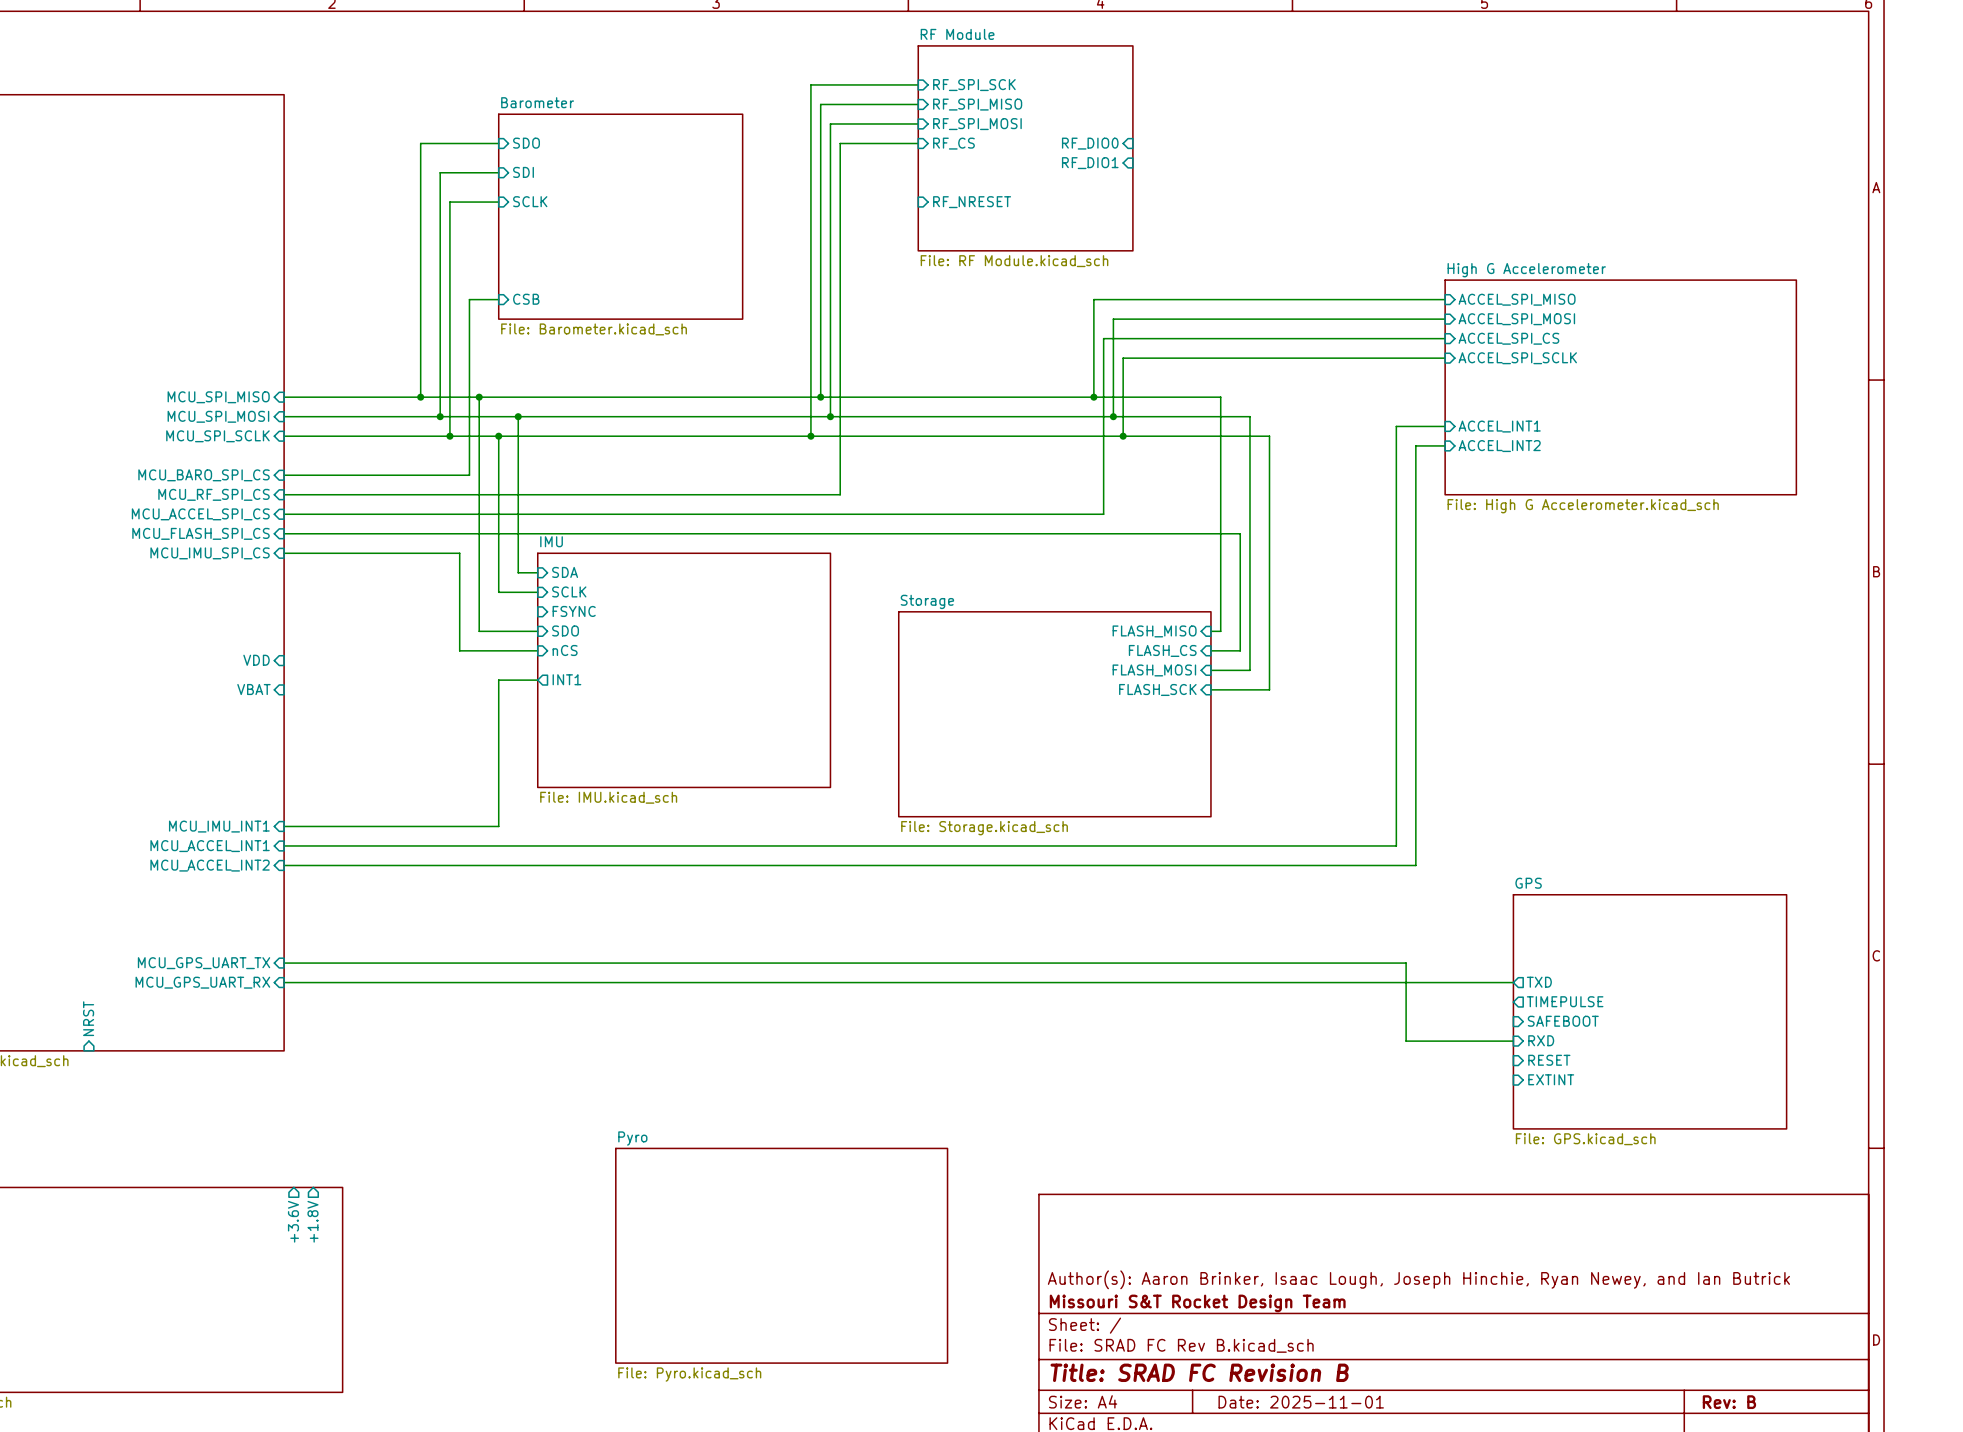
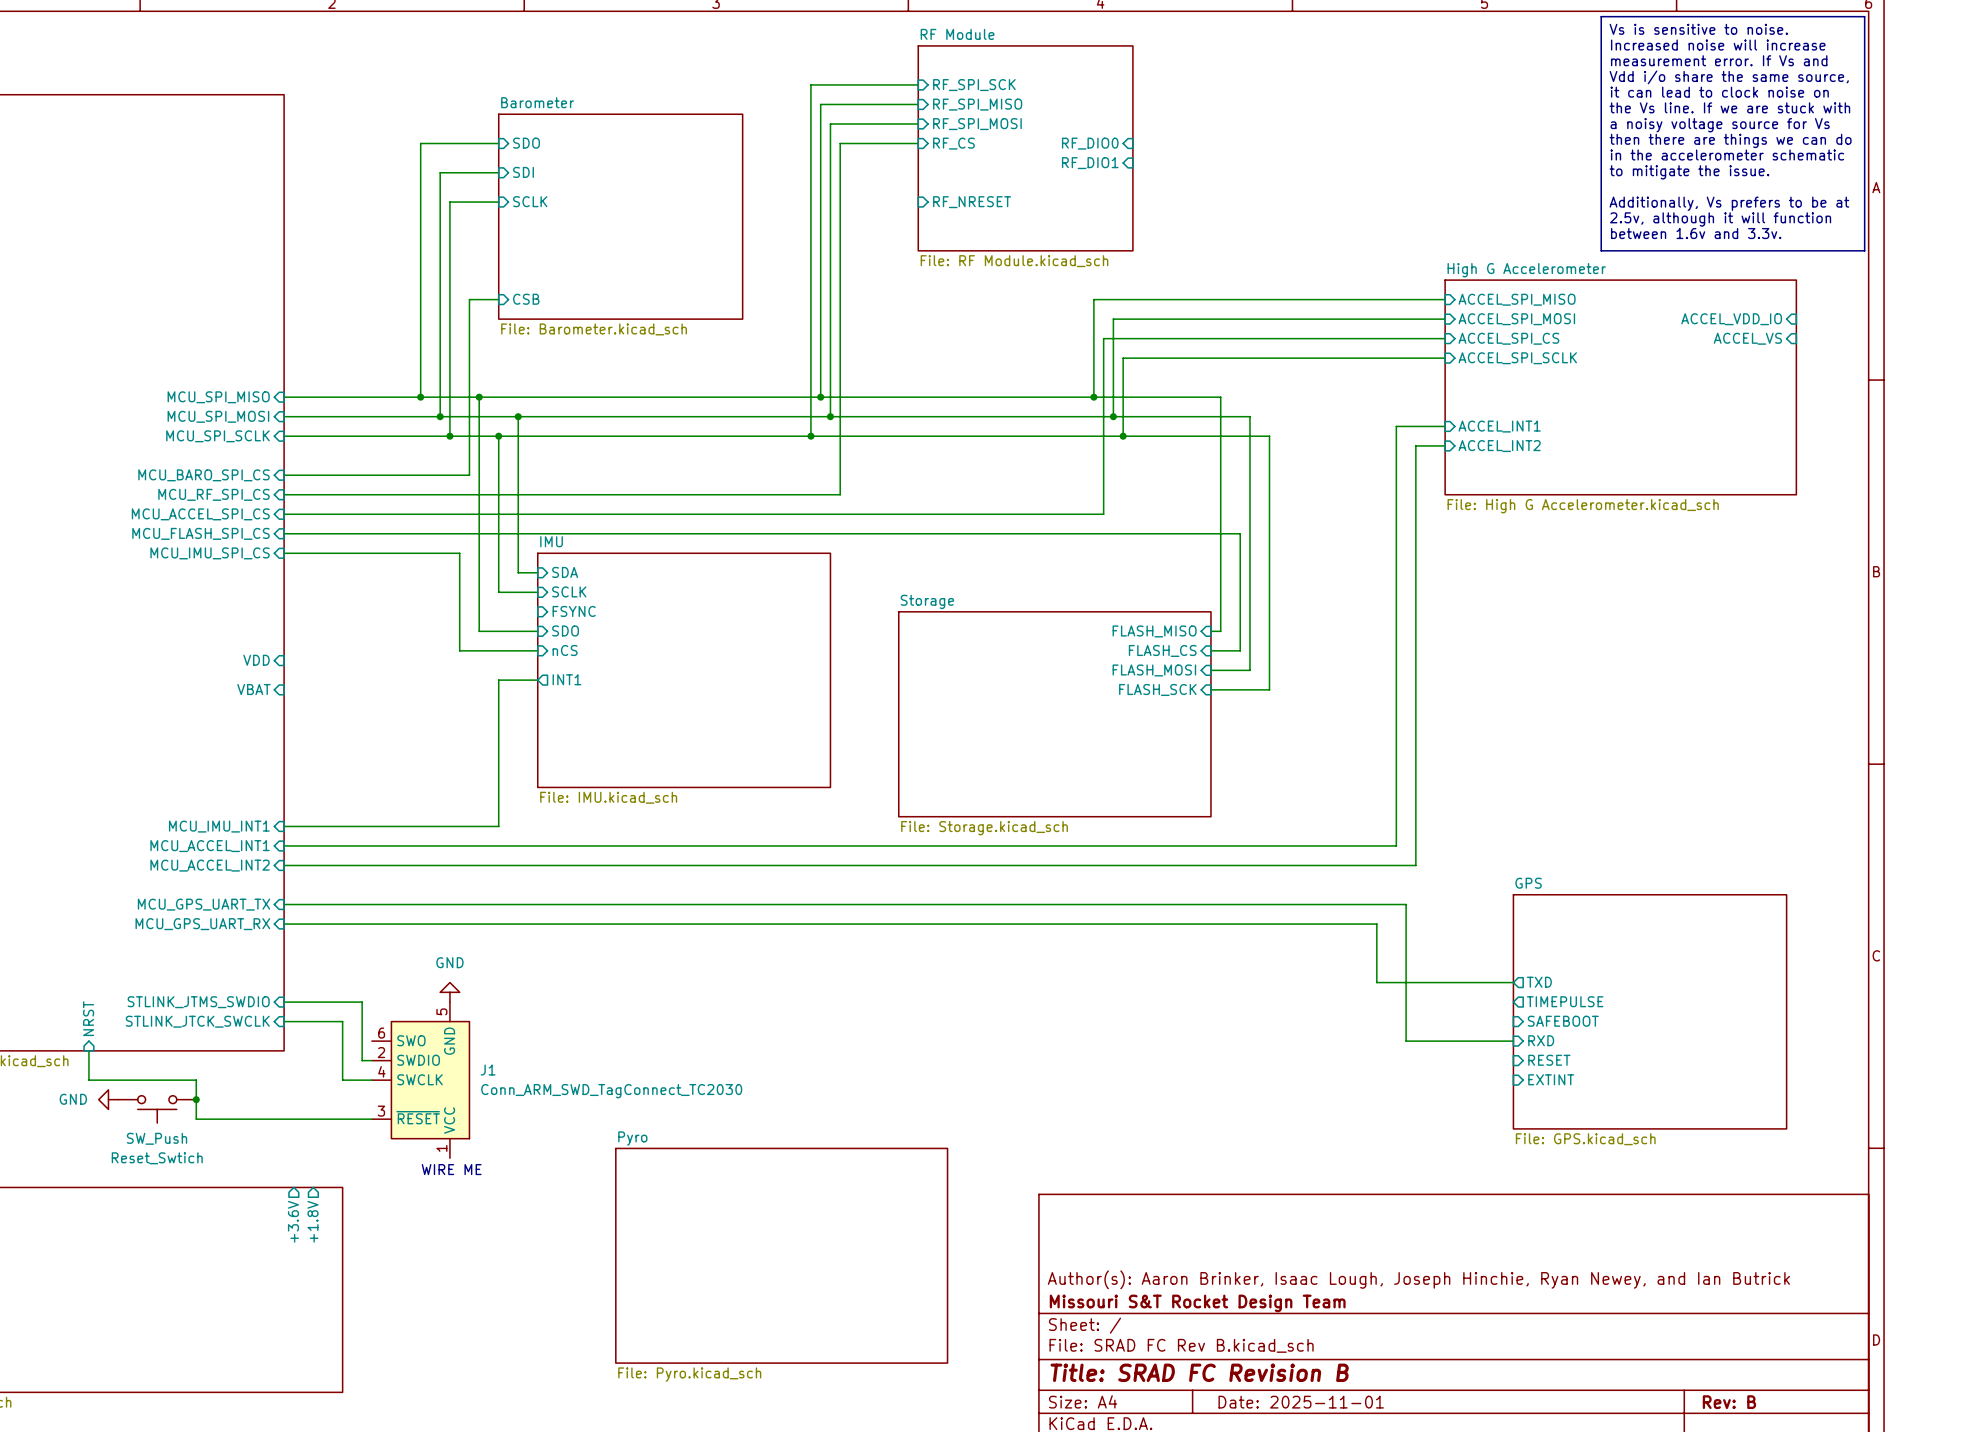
line: none -> (1601, 16) (1864, 16) (1864, 250) (1601, 250) (1601, 16)
text: none -> Vs is sensitive to noise. (1698, 29)
text: none -> Increased noise will increase (1718, 45)
text: none -> measurement error. If Vs and (1719, 60)
text: none -> Vdd i/o share the same source, (1729, 77)
text: none -> it can lead to clock noise on (1719, 92)
text: none -> the Vs line. If we are stuck with (1729, 107)
text: none -> a noisy voltage source for Vs (1720, 125)
text: none -> then there are things we can do (1730, 140)
text: none -> in the accelerometer schematic (1727, 154)
text: none -> to mitigate the issue. (1689, 172)
text: none -> Additionally, Vs prefers to be at (1729, 203)
text: none -> 2.5v, although it will function (1720, 219)
text: none -> between 1.6v and 3.3v. (1696, 233)
sheet pin: none -> ACCEL_VDD_IO (1731, 319)
sheet pin: none -> ACCEL_VS (1747, 338)
sheet pin position: MCU_GPS_UART_TX (204, 963) -> MCU_GPS_UART_TX (204, 904)
wire: (284, 963) (1406, 963) -> (284, 904) (1406, 904) (1406, 963)
sheet pin position: MCU_GPS_UART_RX (202, 982) -> MCU_GPS_UART_RX (202, 924)
wire: (284, 982) (1376, 982) -> (284, 924) (1376, 924) (1376, 982)
power symbol: none -> GND (449, 992)
sheet pin: none -> STLINK_JTMS_SWDIO (198, 1002)
wire: none -> (284, 1002) (362, 1002) (362, 1060) (371, 1060)
sheet pin: none -> STLINK_JTCK_SWCLK (197, 1021)
wire: none -> (284, 1021) (342, 1021) (342, 1080) (371, 1080)
wire: none -> (88, 1050) (88, 1080) (196, 1080) (196, 1119) (371, 1119)
J1: none -> Conn_ARM_SWD_TagConnect_TC2030 (420, 1080)
power symbol: none -> GND (108, 1099)
junction: none -> (196, 1099)
Reset_Swtich: none -> SW_Push (157, 1109)
text: none -> WIRE ME (451, 1169)

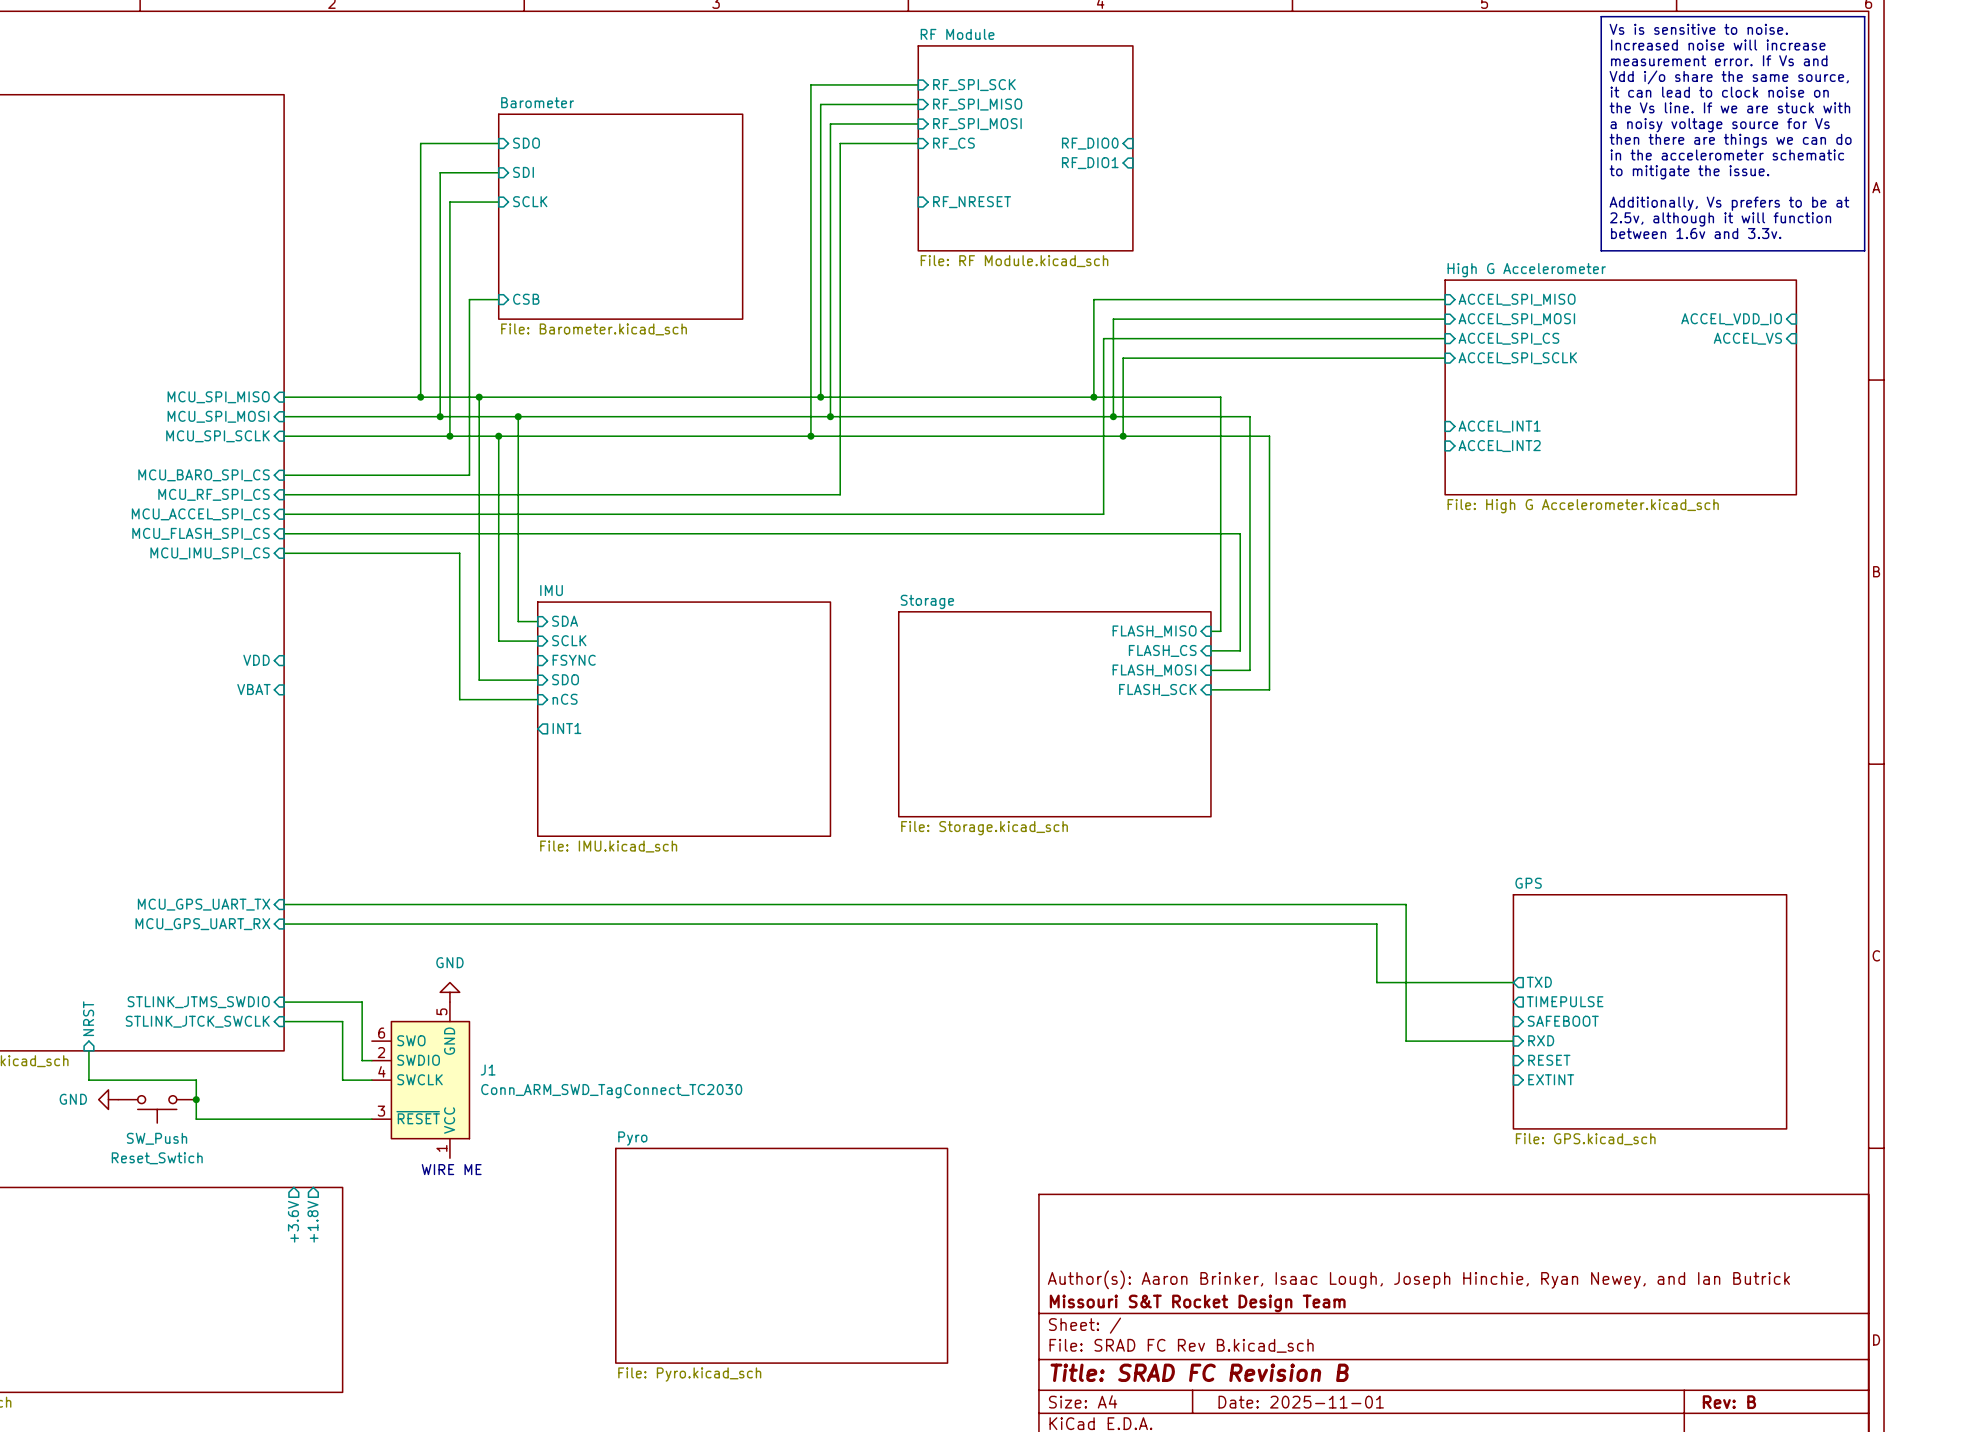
wire: (1445, 426) (1396, 426) (1396, 845) (284, 845) -> none
wire: (1445, 445) (1415, 445) (1415, 865) (284, 865) -> none
wire: (518, 572) (537, 572) -> (518, 572) (518, 621) (537, 621)
sheet pin position: SDA (565, 572) -> SDA (565, 621)
sheet pin position: SCLK (569, 591) -> SCLK (569, 640)
wire: (498, 592) (537, 592) -> (498, 592) (498, 641) (537, 641)
sheet pin position: FSYNC (574, 611) -> FSYNC (574, 660)
sheet pin: SDO (565, 630) -> none
wire: (479, 631) (537, 631) -> (479, 631) (479, 680) (498, 680)
wire: (459, 650) (537, 650) -> (459, 650) (459, 699) (537, 699)
sheet pin position: nCS (565, 650) -> nCS (565, 699)
sheet IMU position: (684, 670) -> (684, 719)
sheet pin shape: output (566, 679) -> input (565, 679)
sheet pin: INT1 (566, 679) -> SDO (565, 679)
wire: (498, 680) (498, 826) (284, 826) -> none
sheet pin: none -> INT1 (566, 728)
sheet pin: MCU_IMU_INT1 (219, 826) -> none
sheet pin: MCU_ACCEL_INT1 (210, 846) -> none
sheet pin: MCU_ACCEL_INT2 (210, 865) -> none

